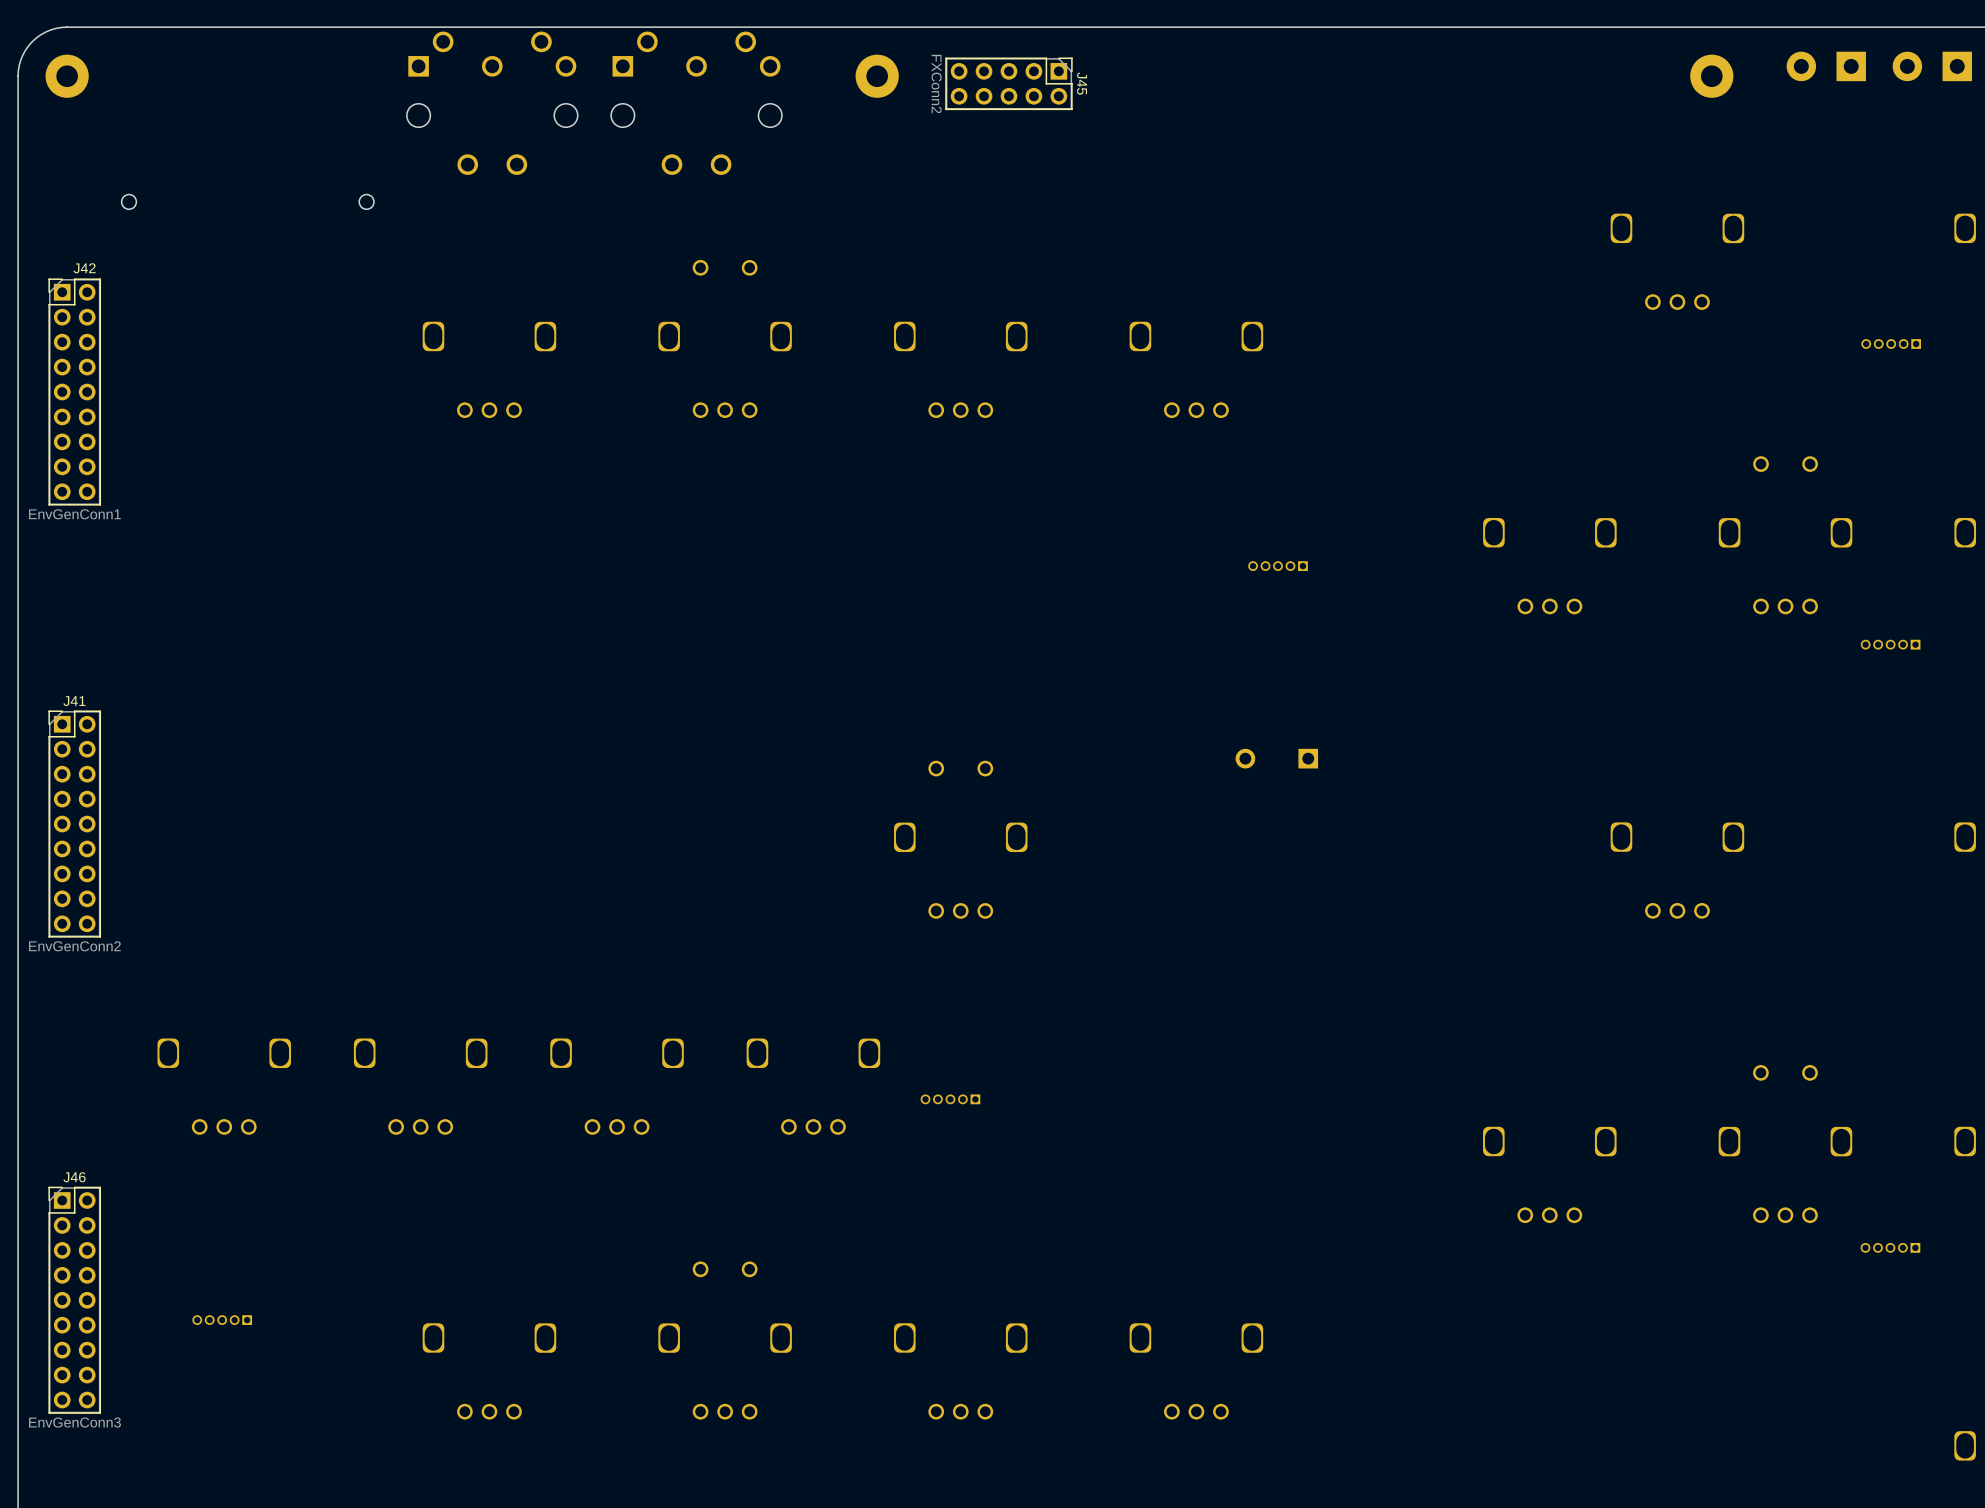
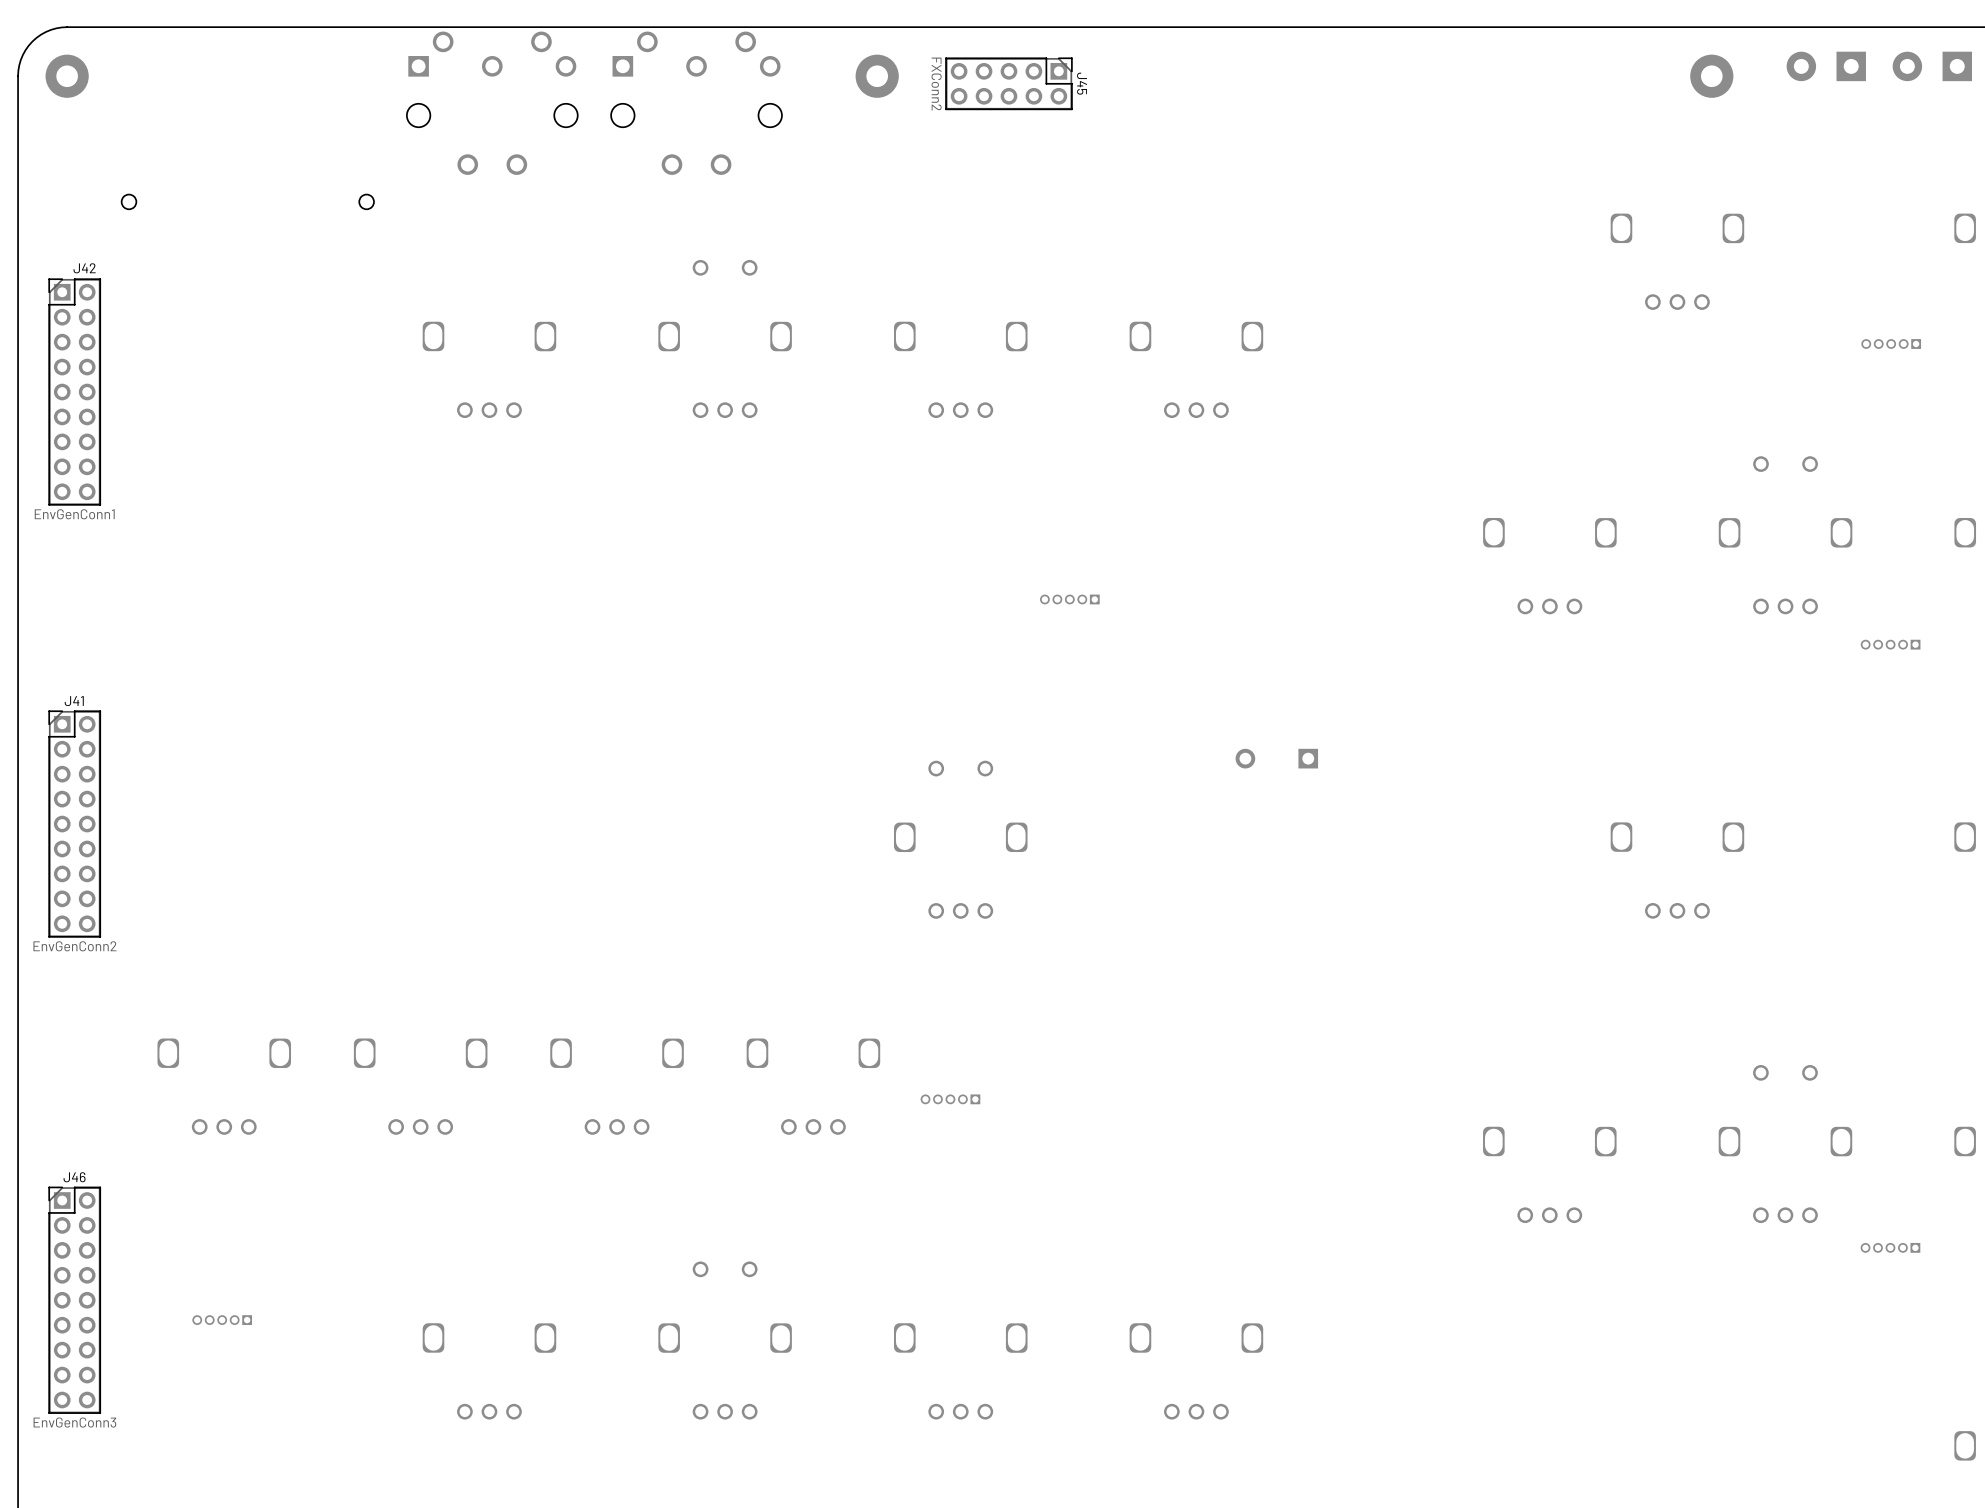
part position: (1278, 566) -> (1069, 599)

